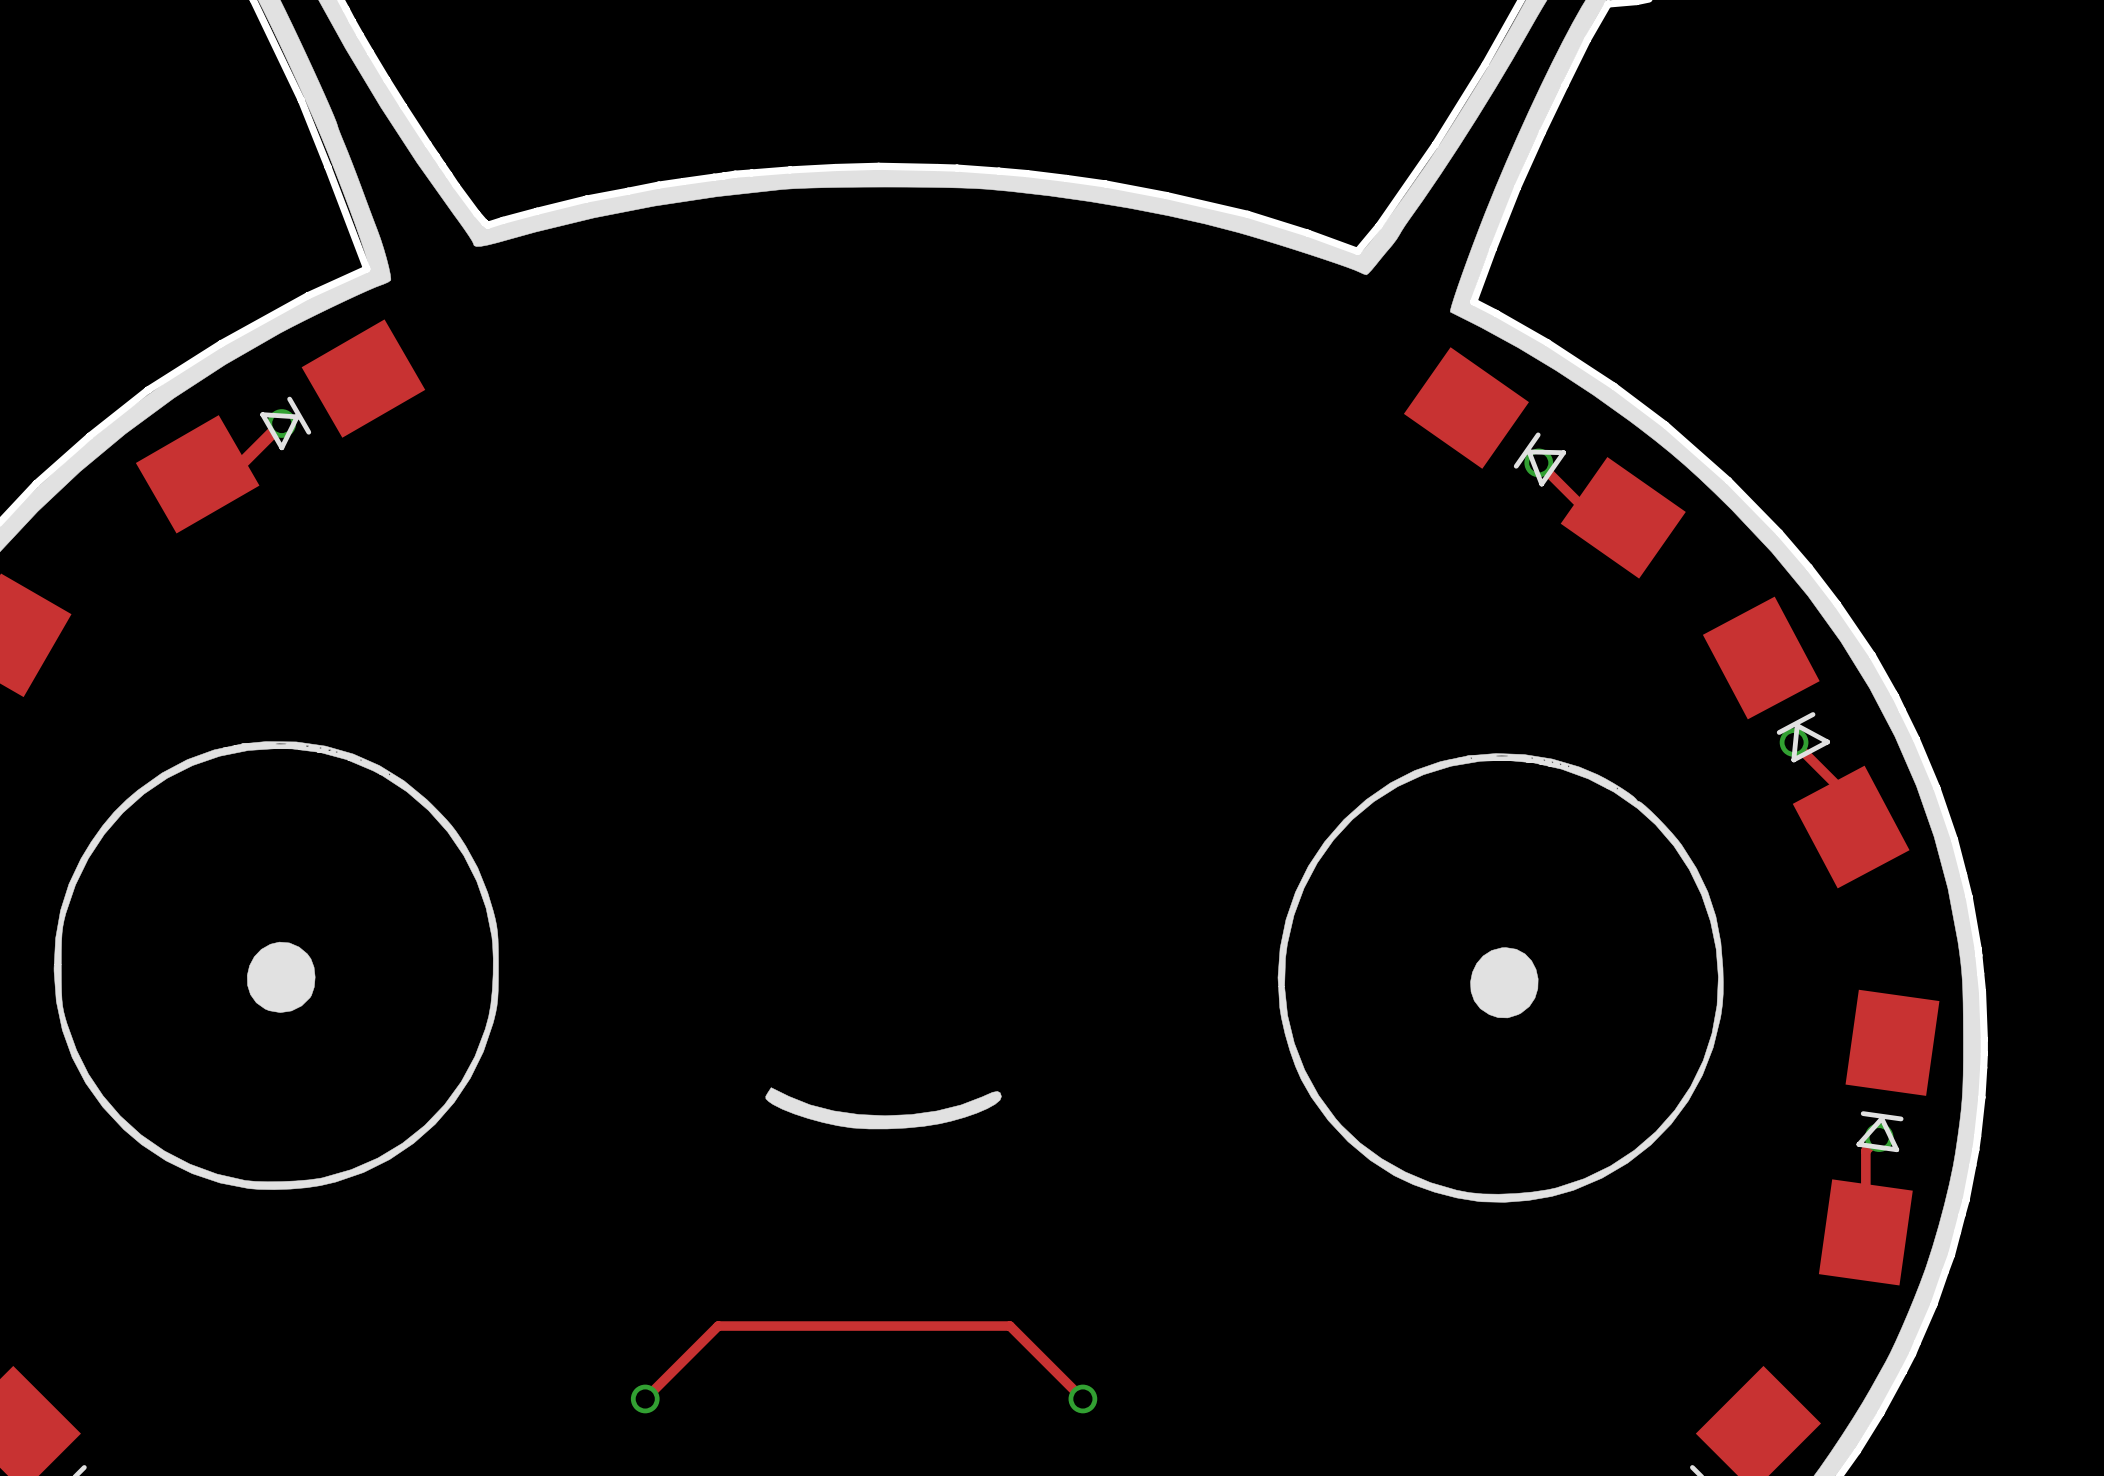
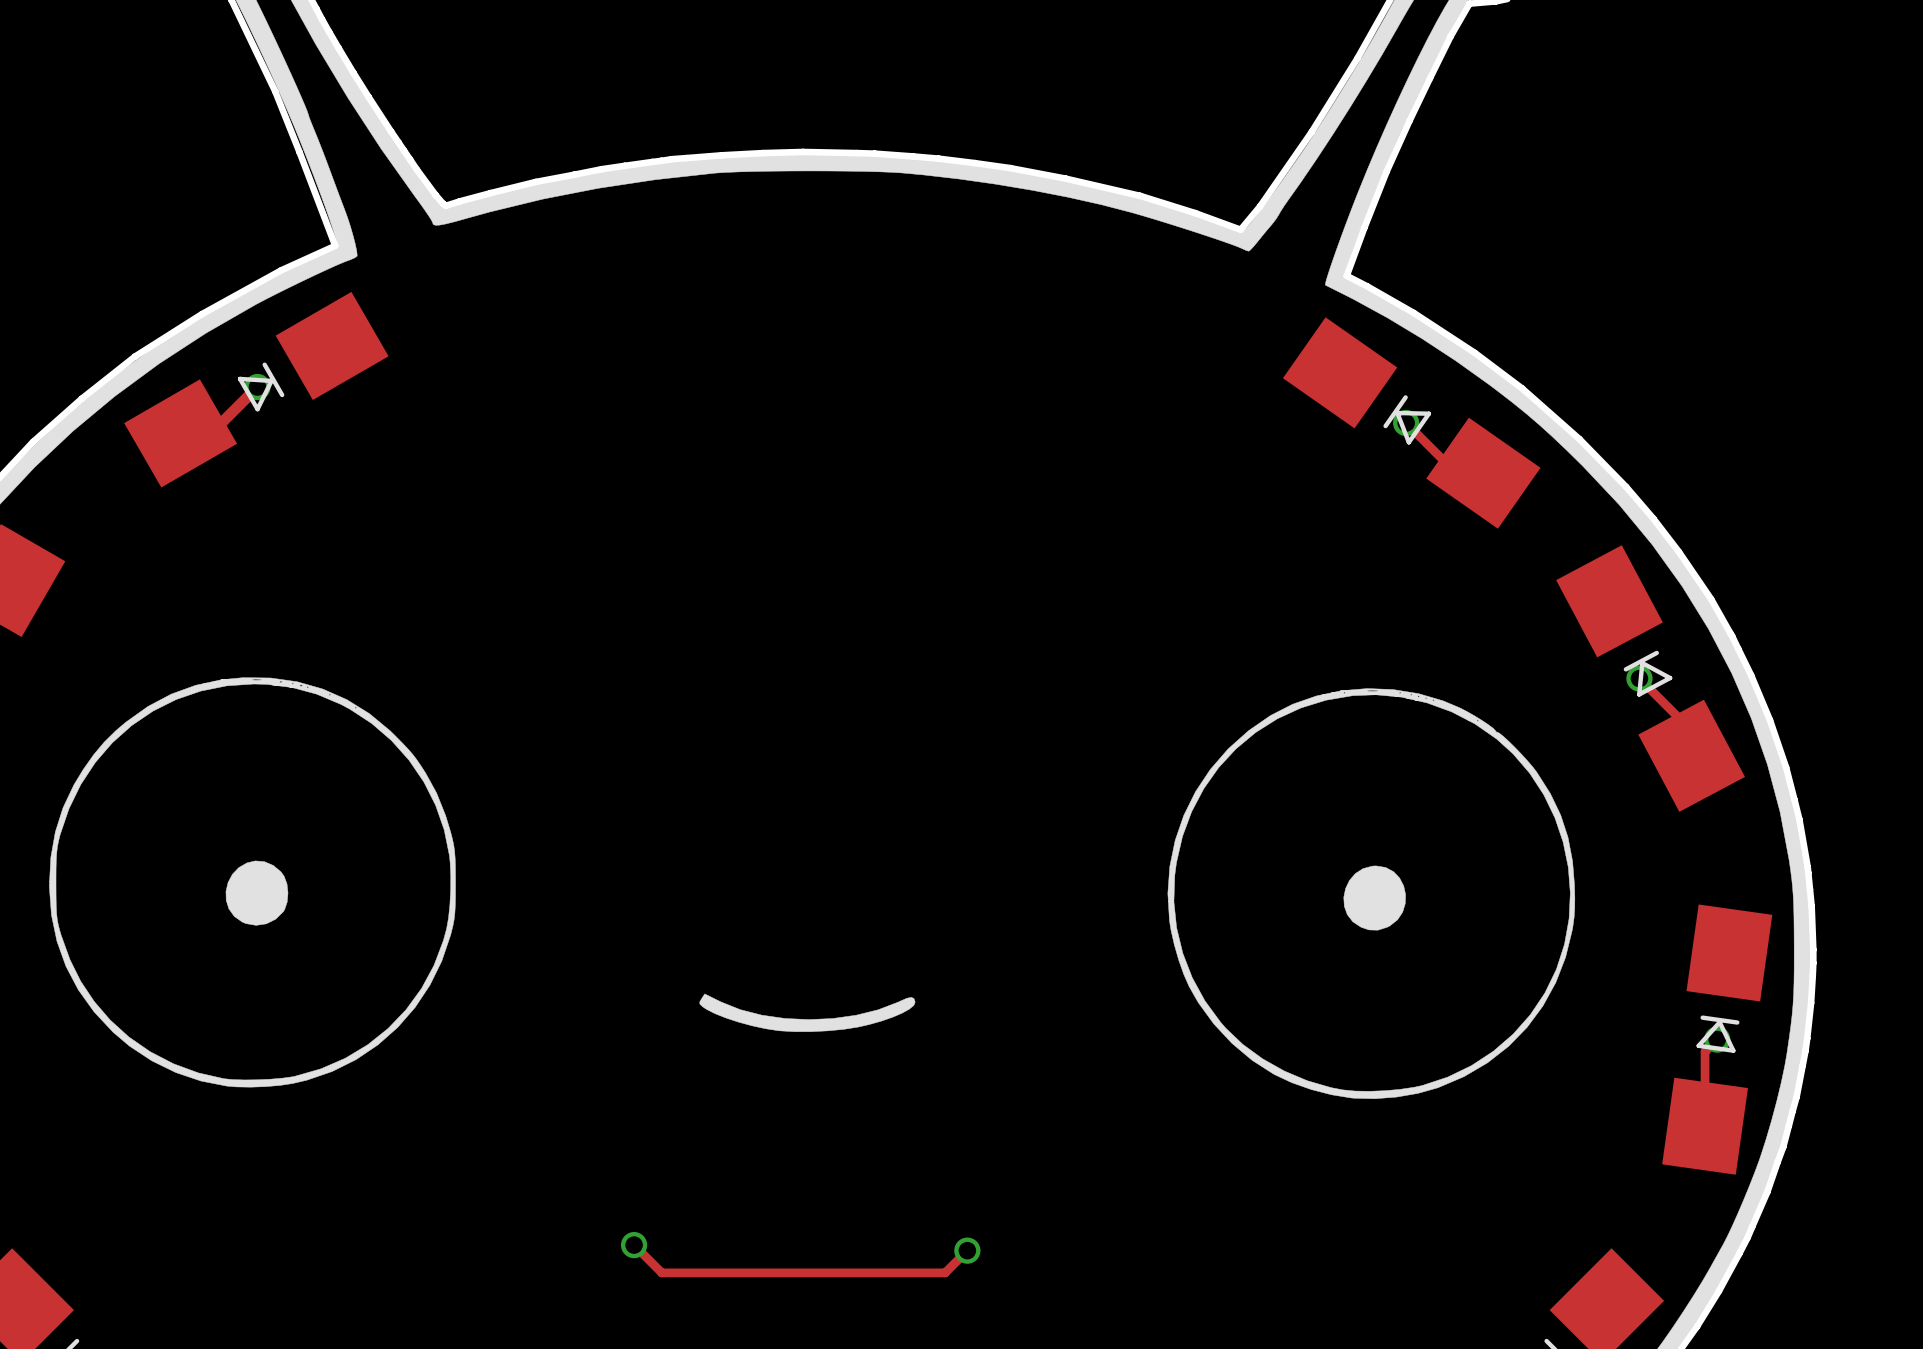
track: none -> (634, 1245) (661, 1272) (945, 1272) (967, 1250)
track: (645, 1398) (718, 1326) (1009, 1326) (1082, 1398) -> none
via position: (645, 1398) -> (634, 1245)
via position: (1082, 1398) -> (967, 1250)

